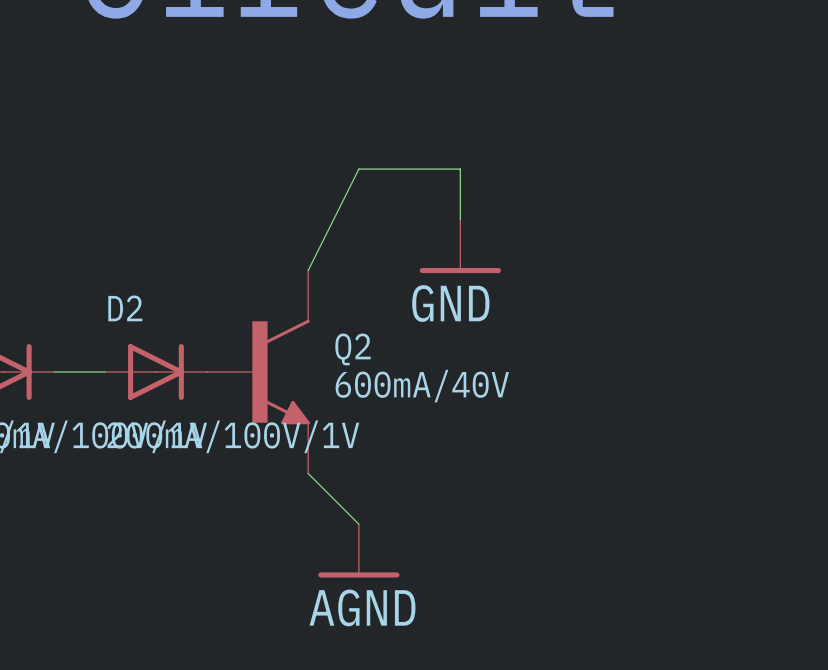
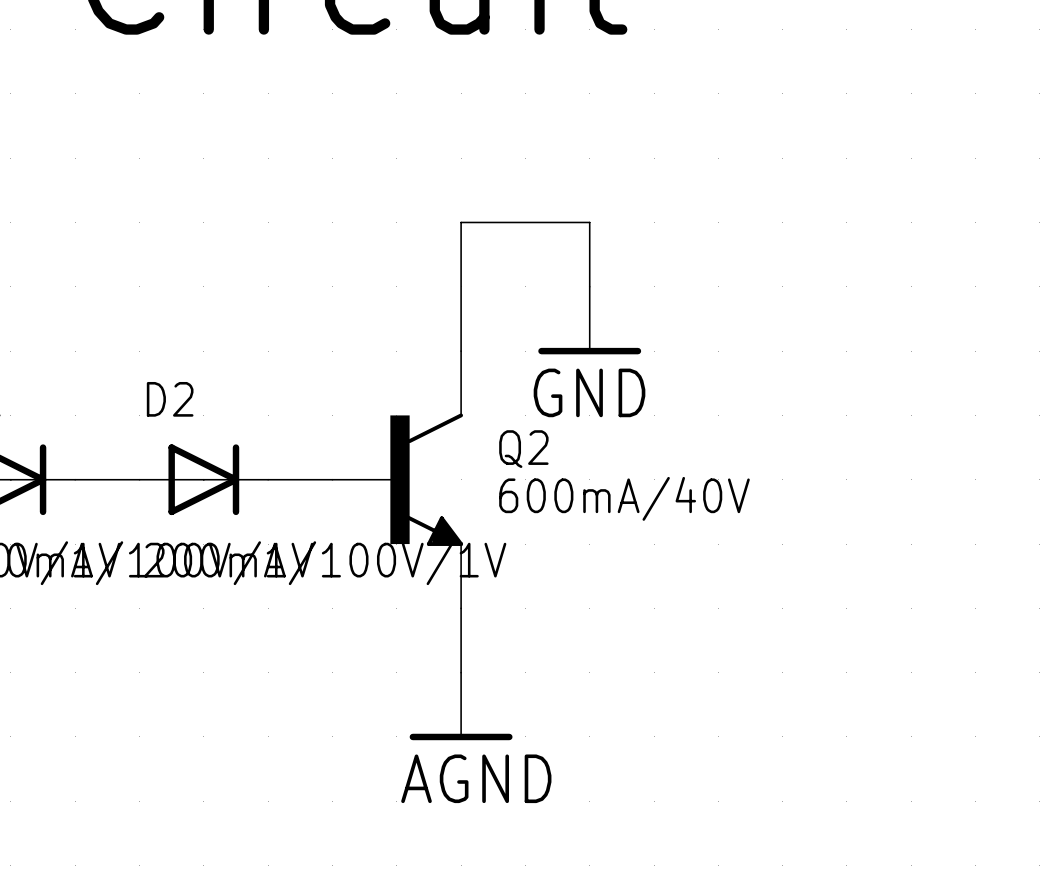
wire: (358, 169) (308, 270) -> (461, 222) (461, 351)
Q2 position: (258, 372) -> (397, 479)
wire: (308, 473) (358, 524) -> (461, 608) (461, 672)

